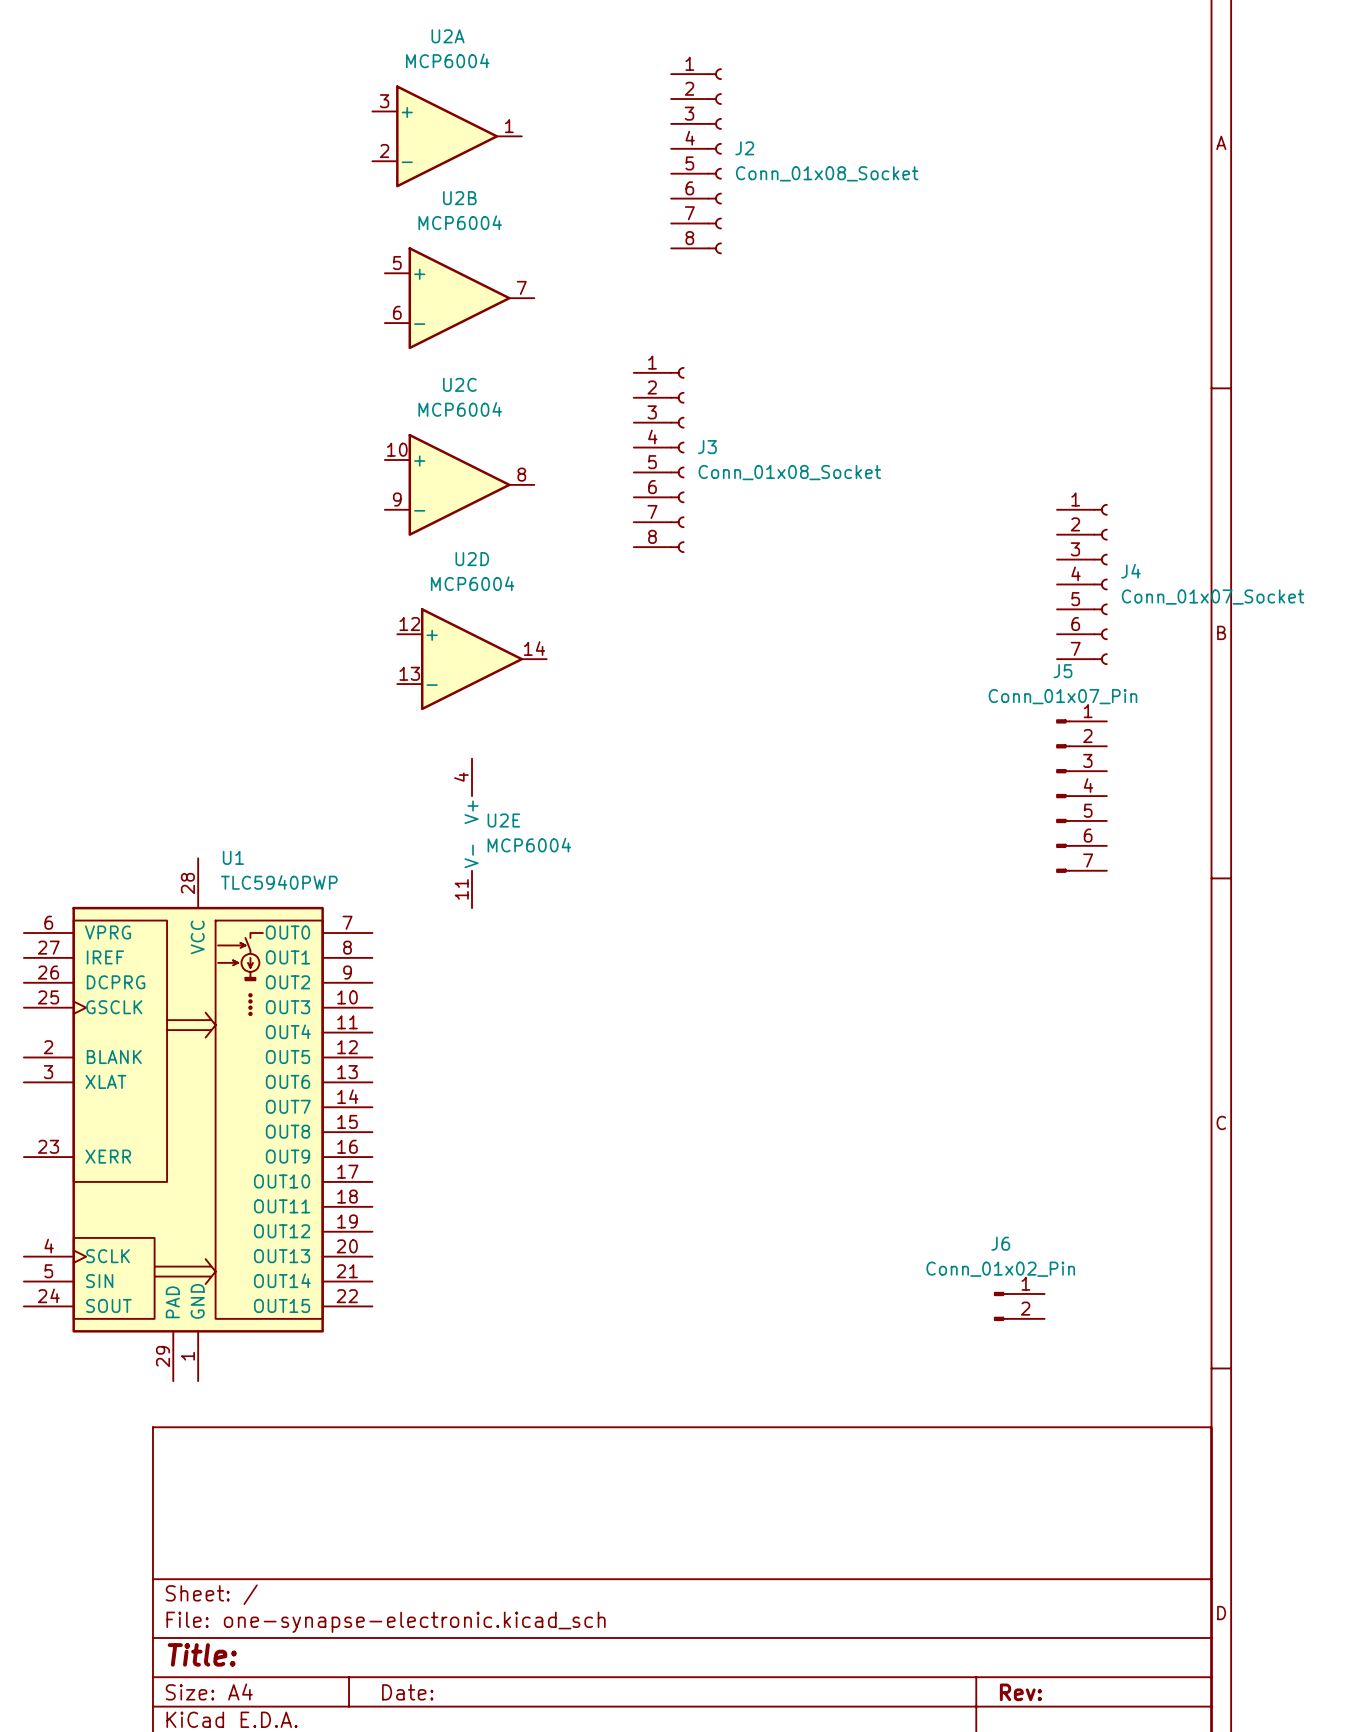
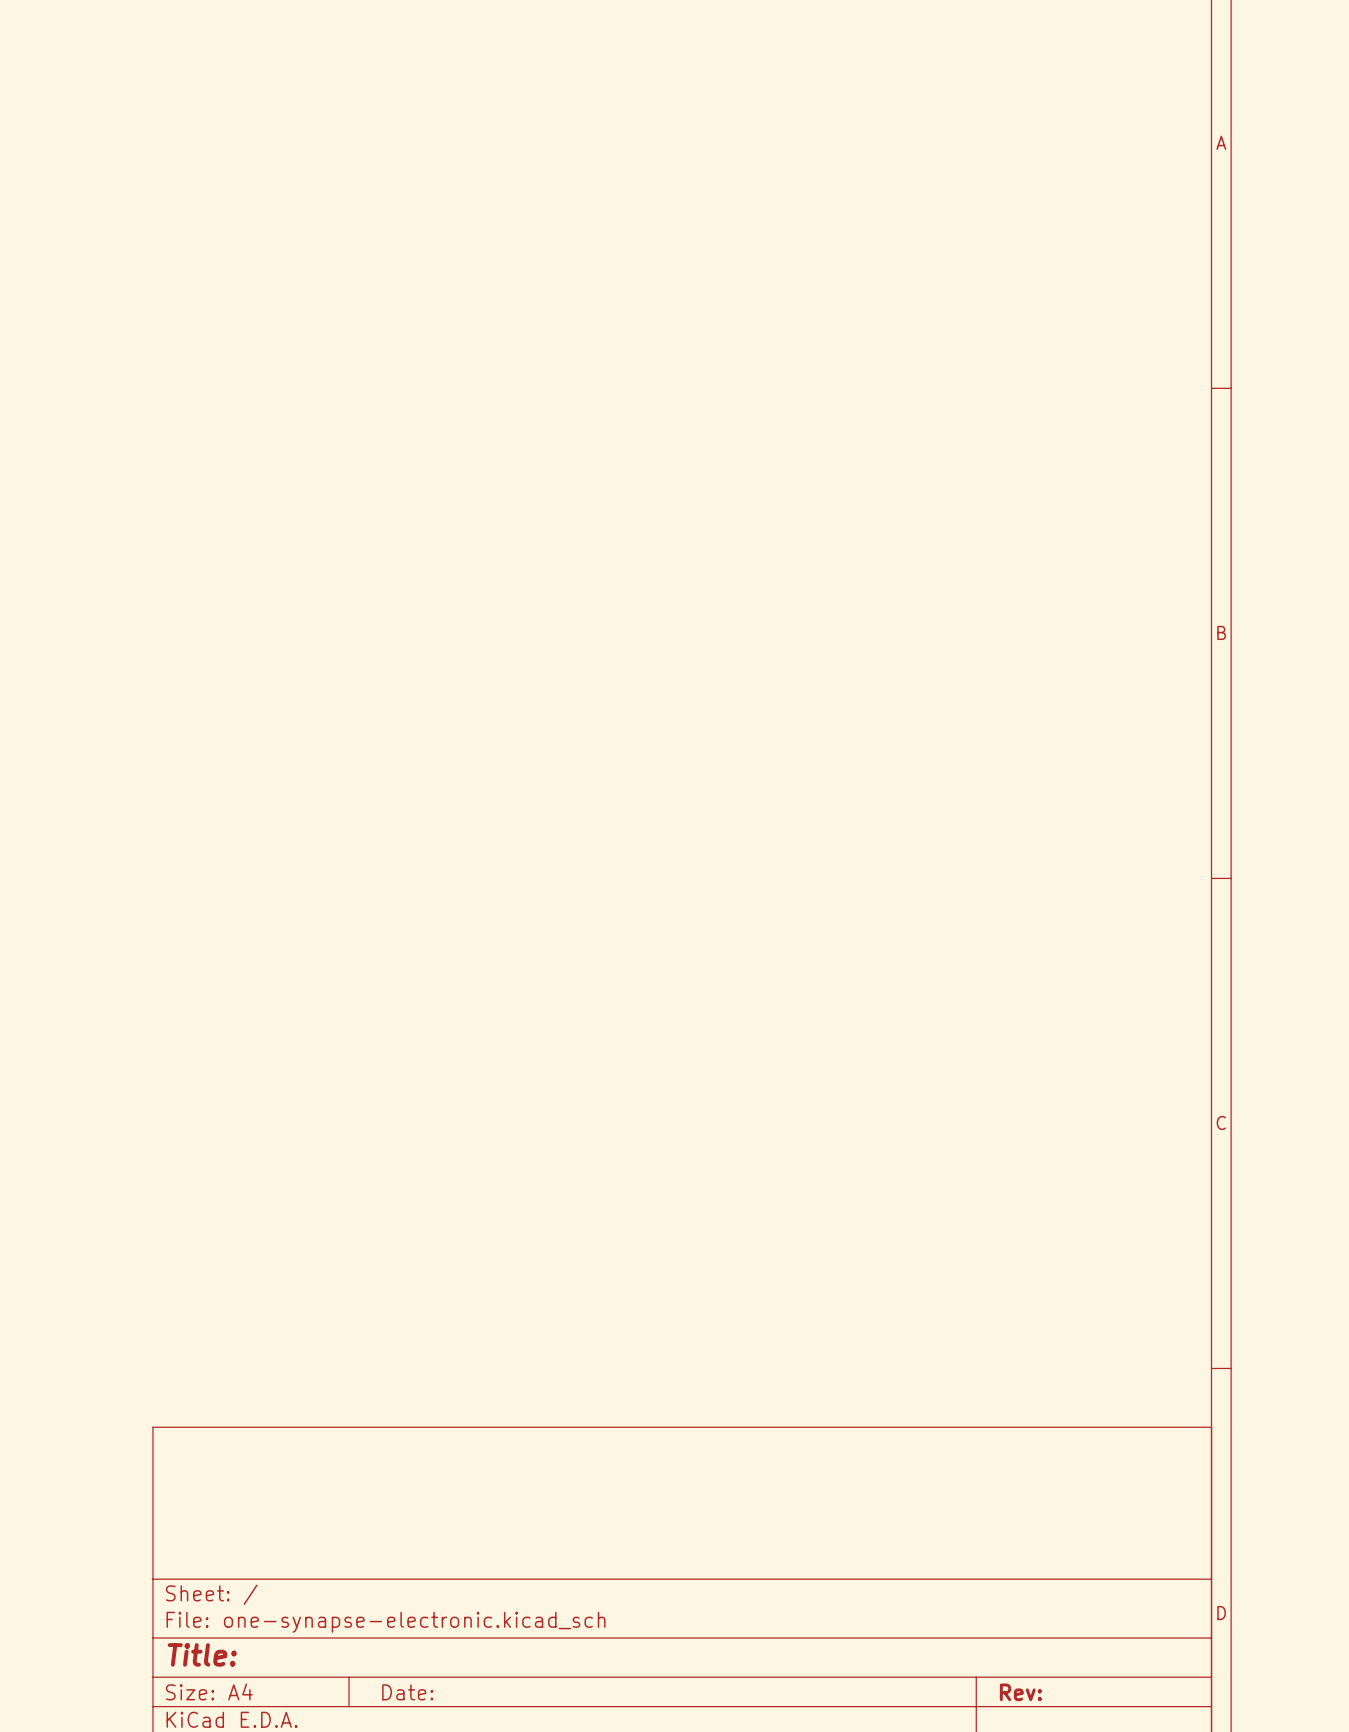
U2A: MCP6004 (447, 136) -> none
J2: Conn_01x08_Socket (696, 161) -> none
U2B: MCP6004 (459, 298) -> none
J3: Conn_01x08_Socket (659, 460) -> none
U2C: MCP6004 (459, 484) -> none
J4: Conn_01x07_Socket (1082, 584) -> none
U2D: MCP6004 (472, 659) -> none
J5: Conn_01x07_Pin (1081, 796) -> none
U2E: MCP6004 (472, 833) -> none
U1: TLC5940PWP (198, 1119) -> none
J6: Conn_01x02_Pin (1019, 1306) -> none

